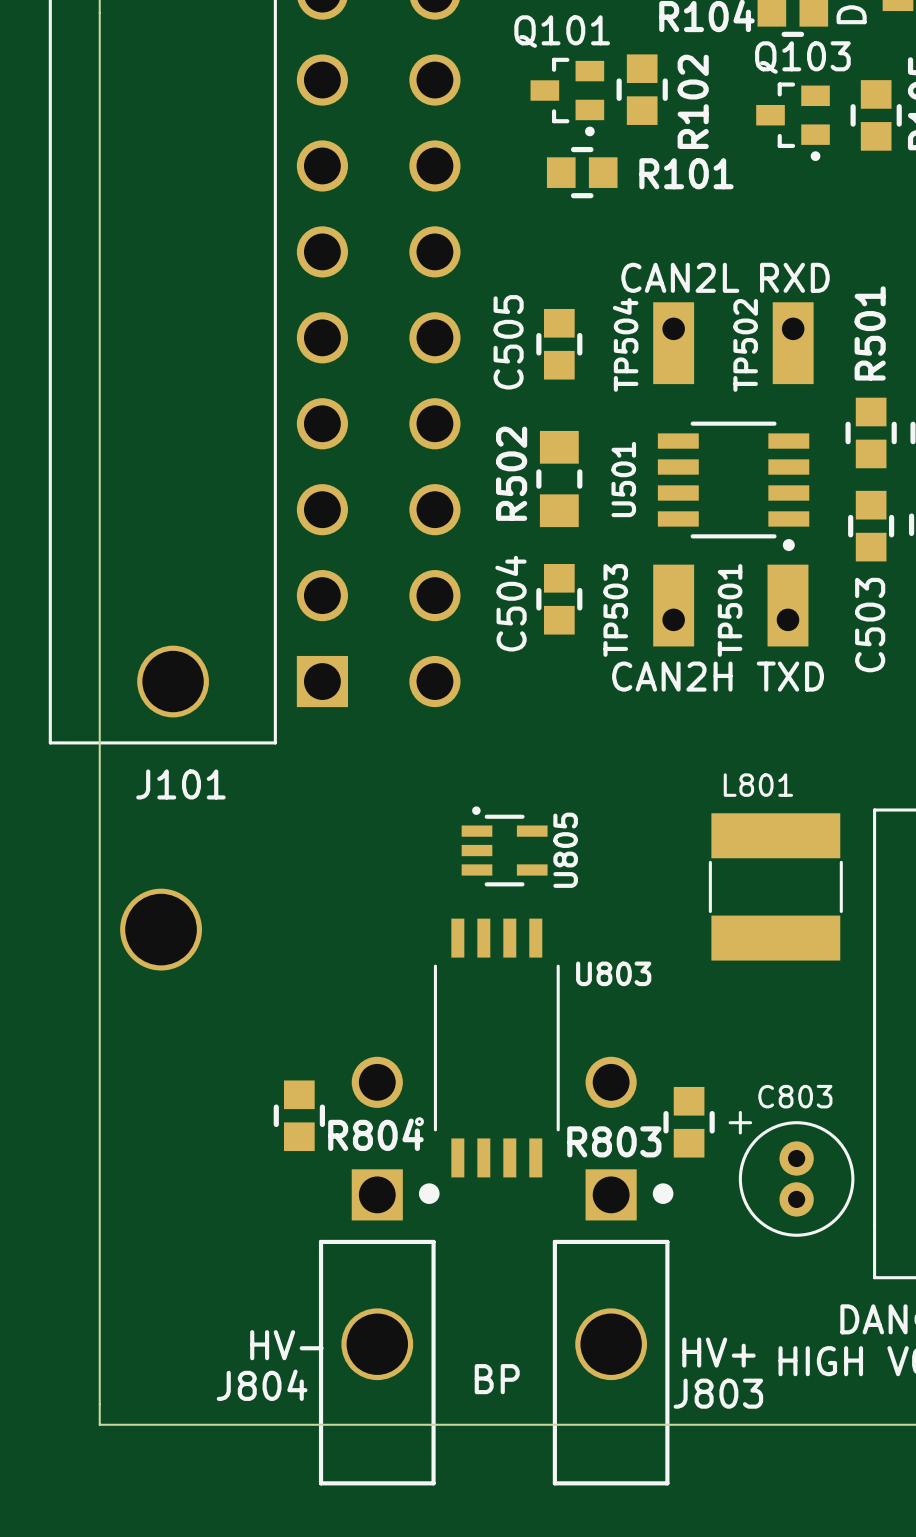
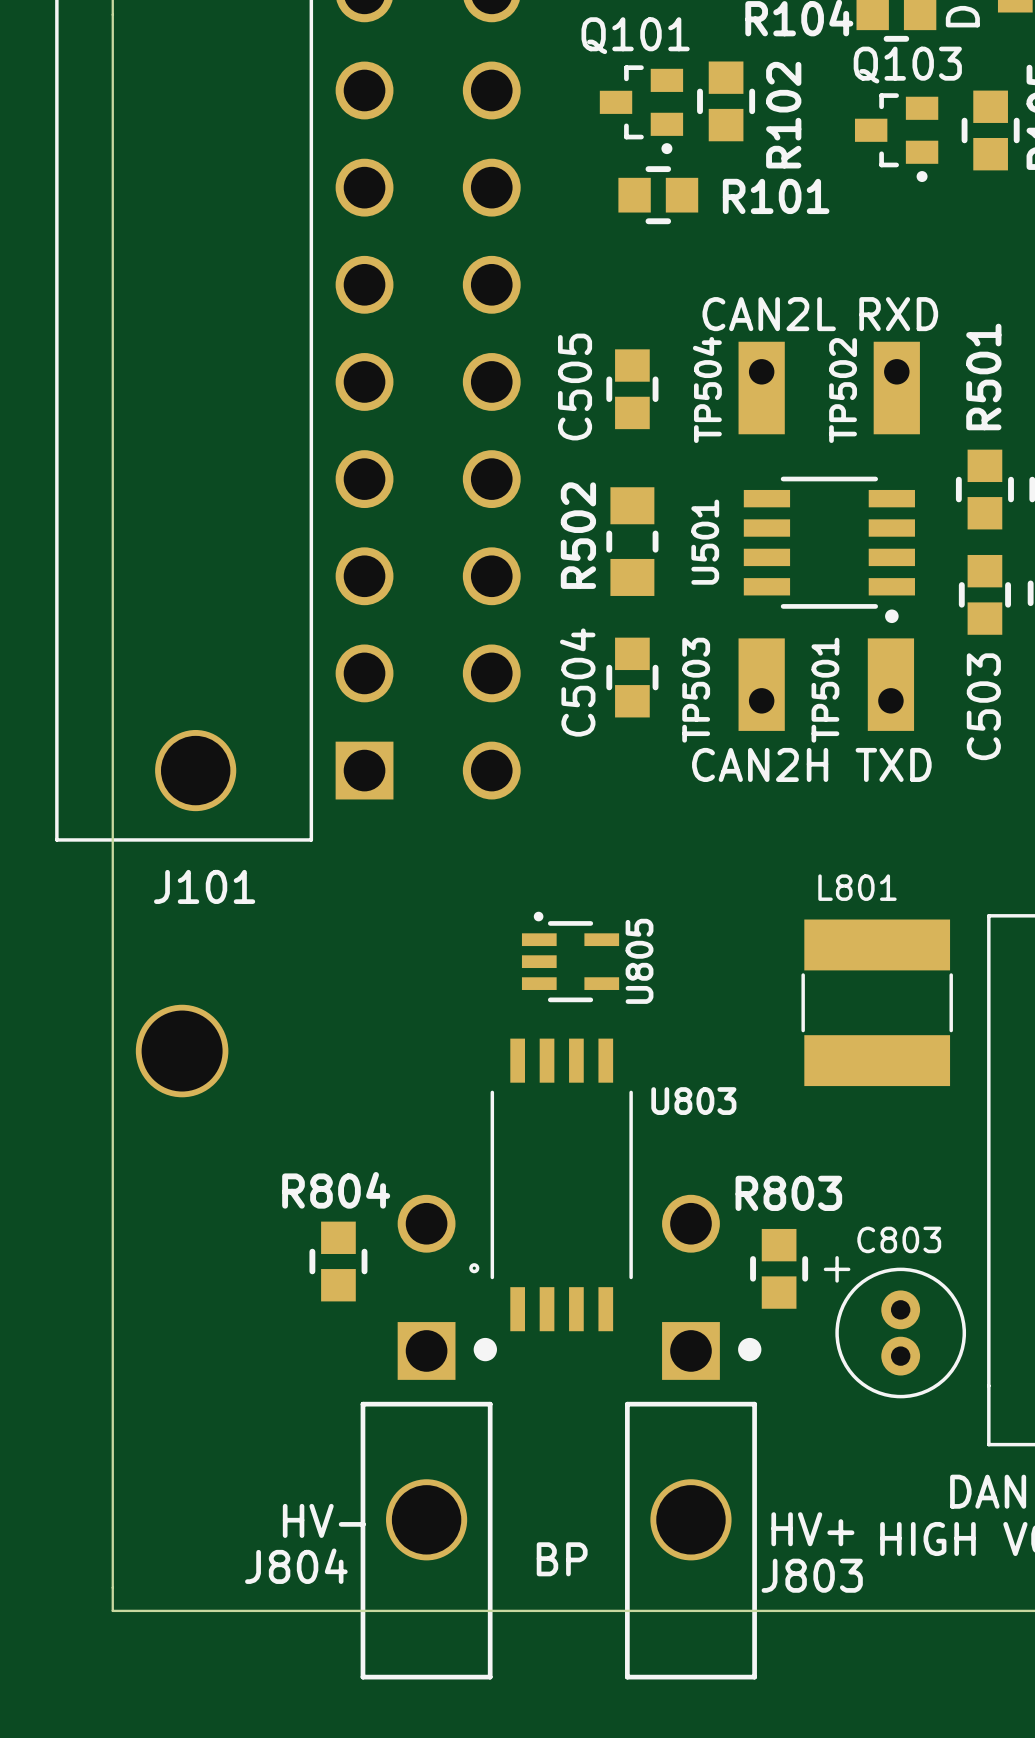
R804 name position: R804 (375, 1134) -> R804 (336, 1190)
R803 name position: R803 (614, 1141) -> R803 (788, 1193)

